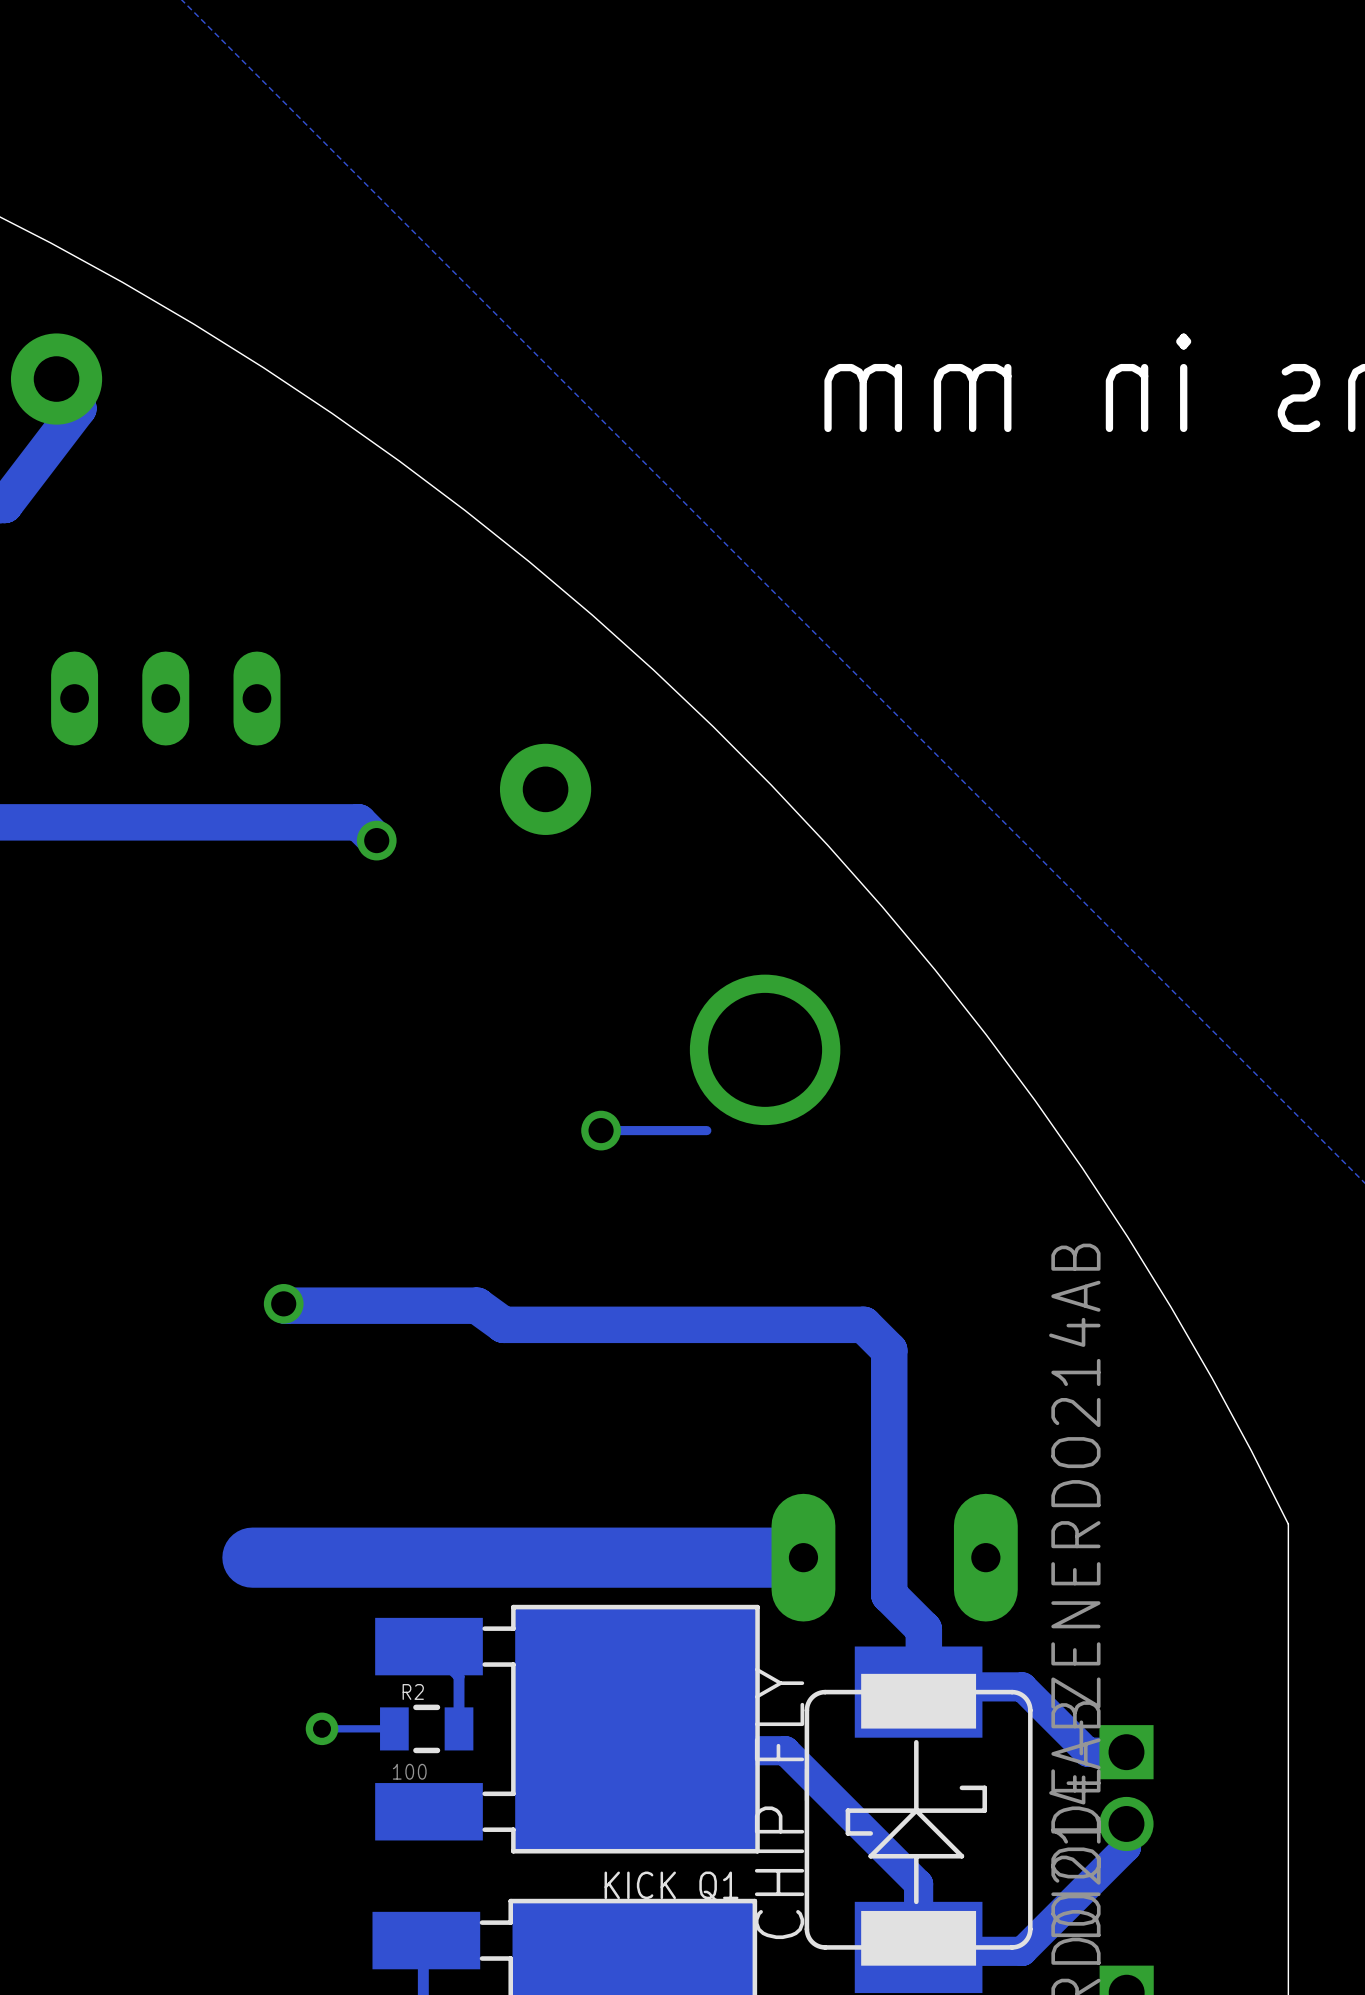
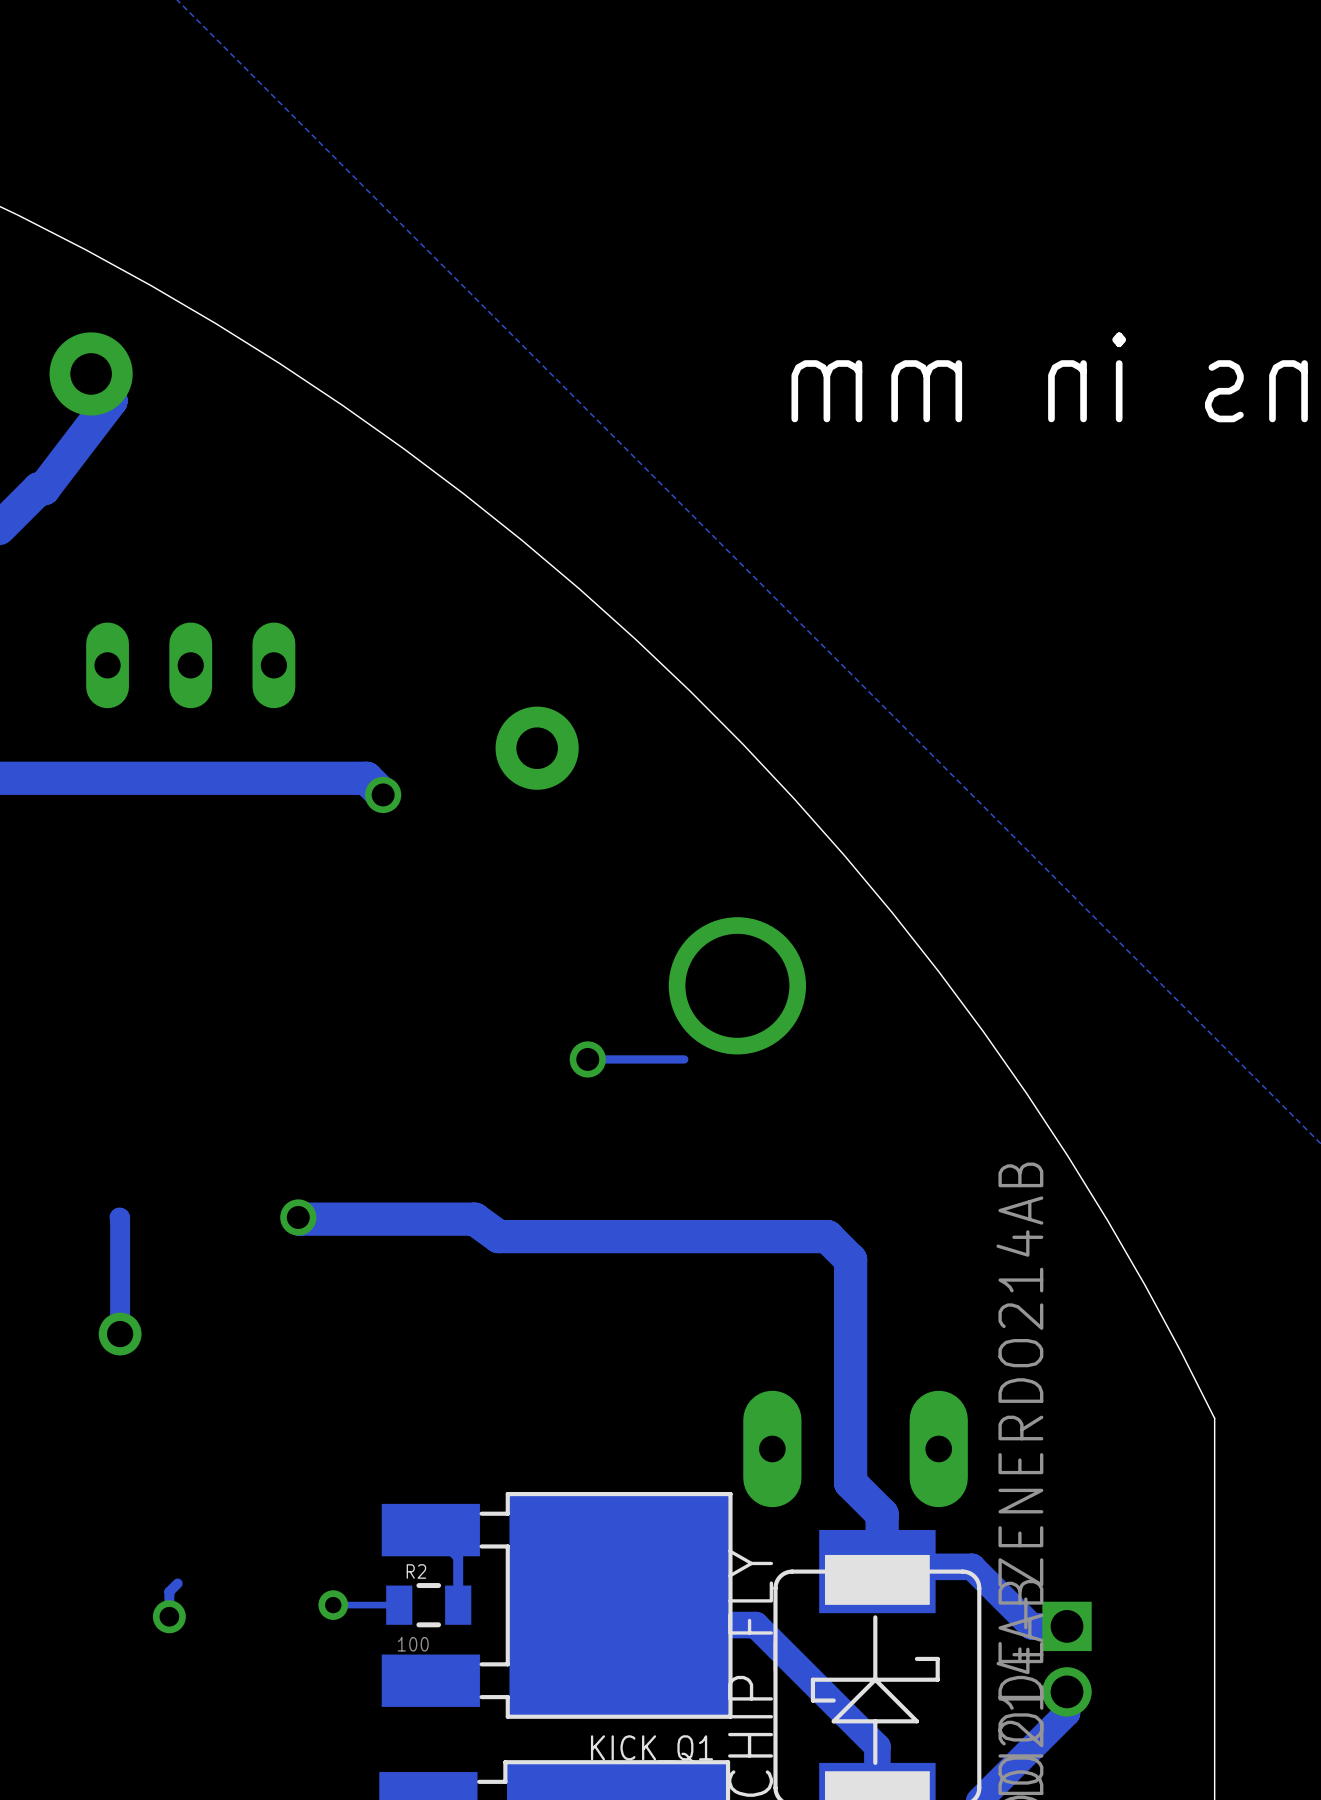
track: none -> (119, 1217) (120, 1334)
part: none -> (120, 1334)
track: (803, 1557) (252, 1557) -> none
track: none -> (177, 1583) (169, 1591) (169, 1616)
via: none -> (169, 1616)

